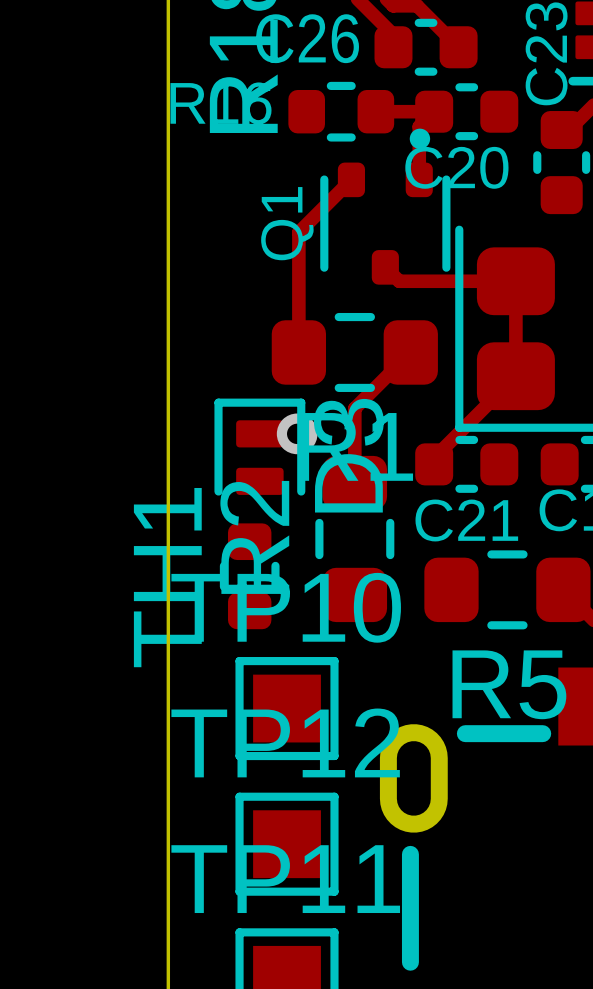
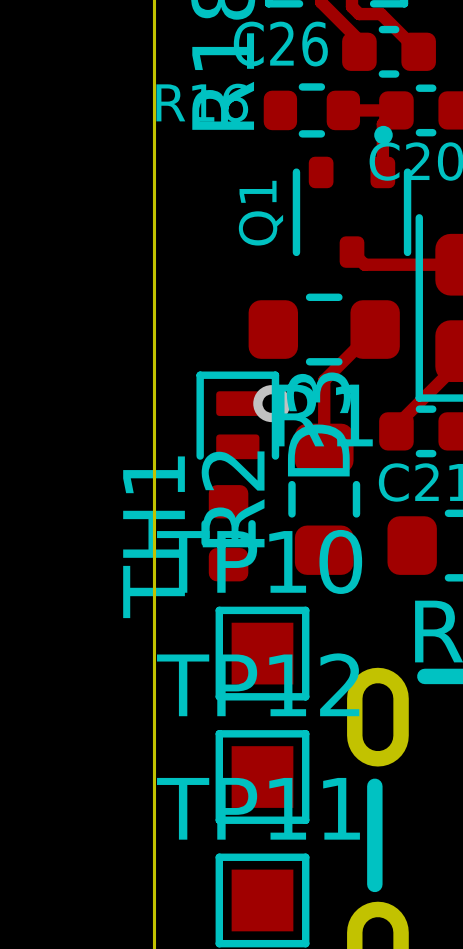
top track: (351, 179) (298, 232) (298, 352) -> none

